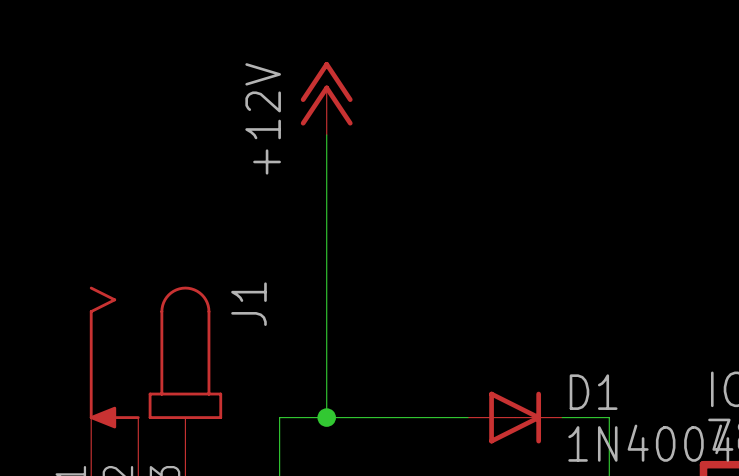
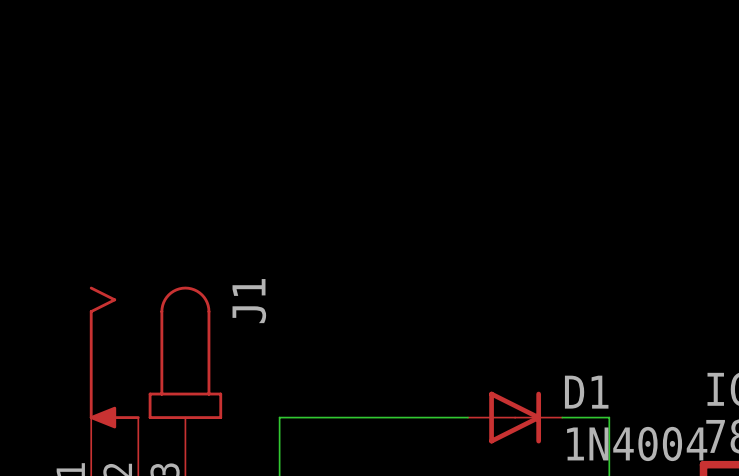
power symbol: +12V (326, 98) -> none
wire: (326, 134) (326, 417) -> none
junction: (326, 417) -> none

